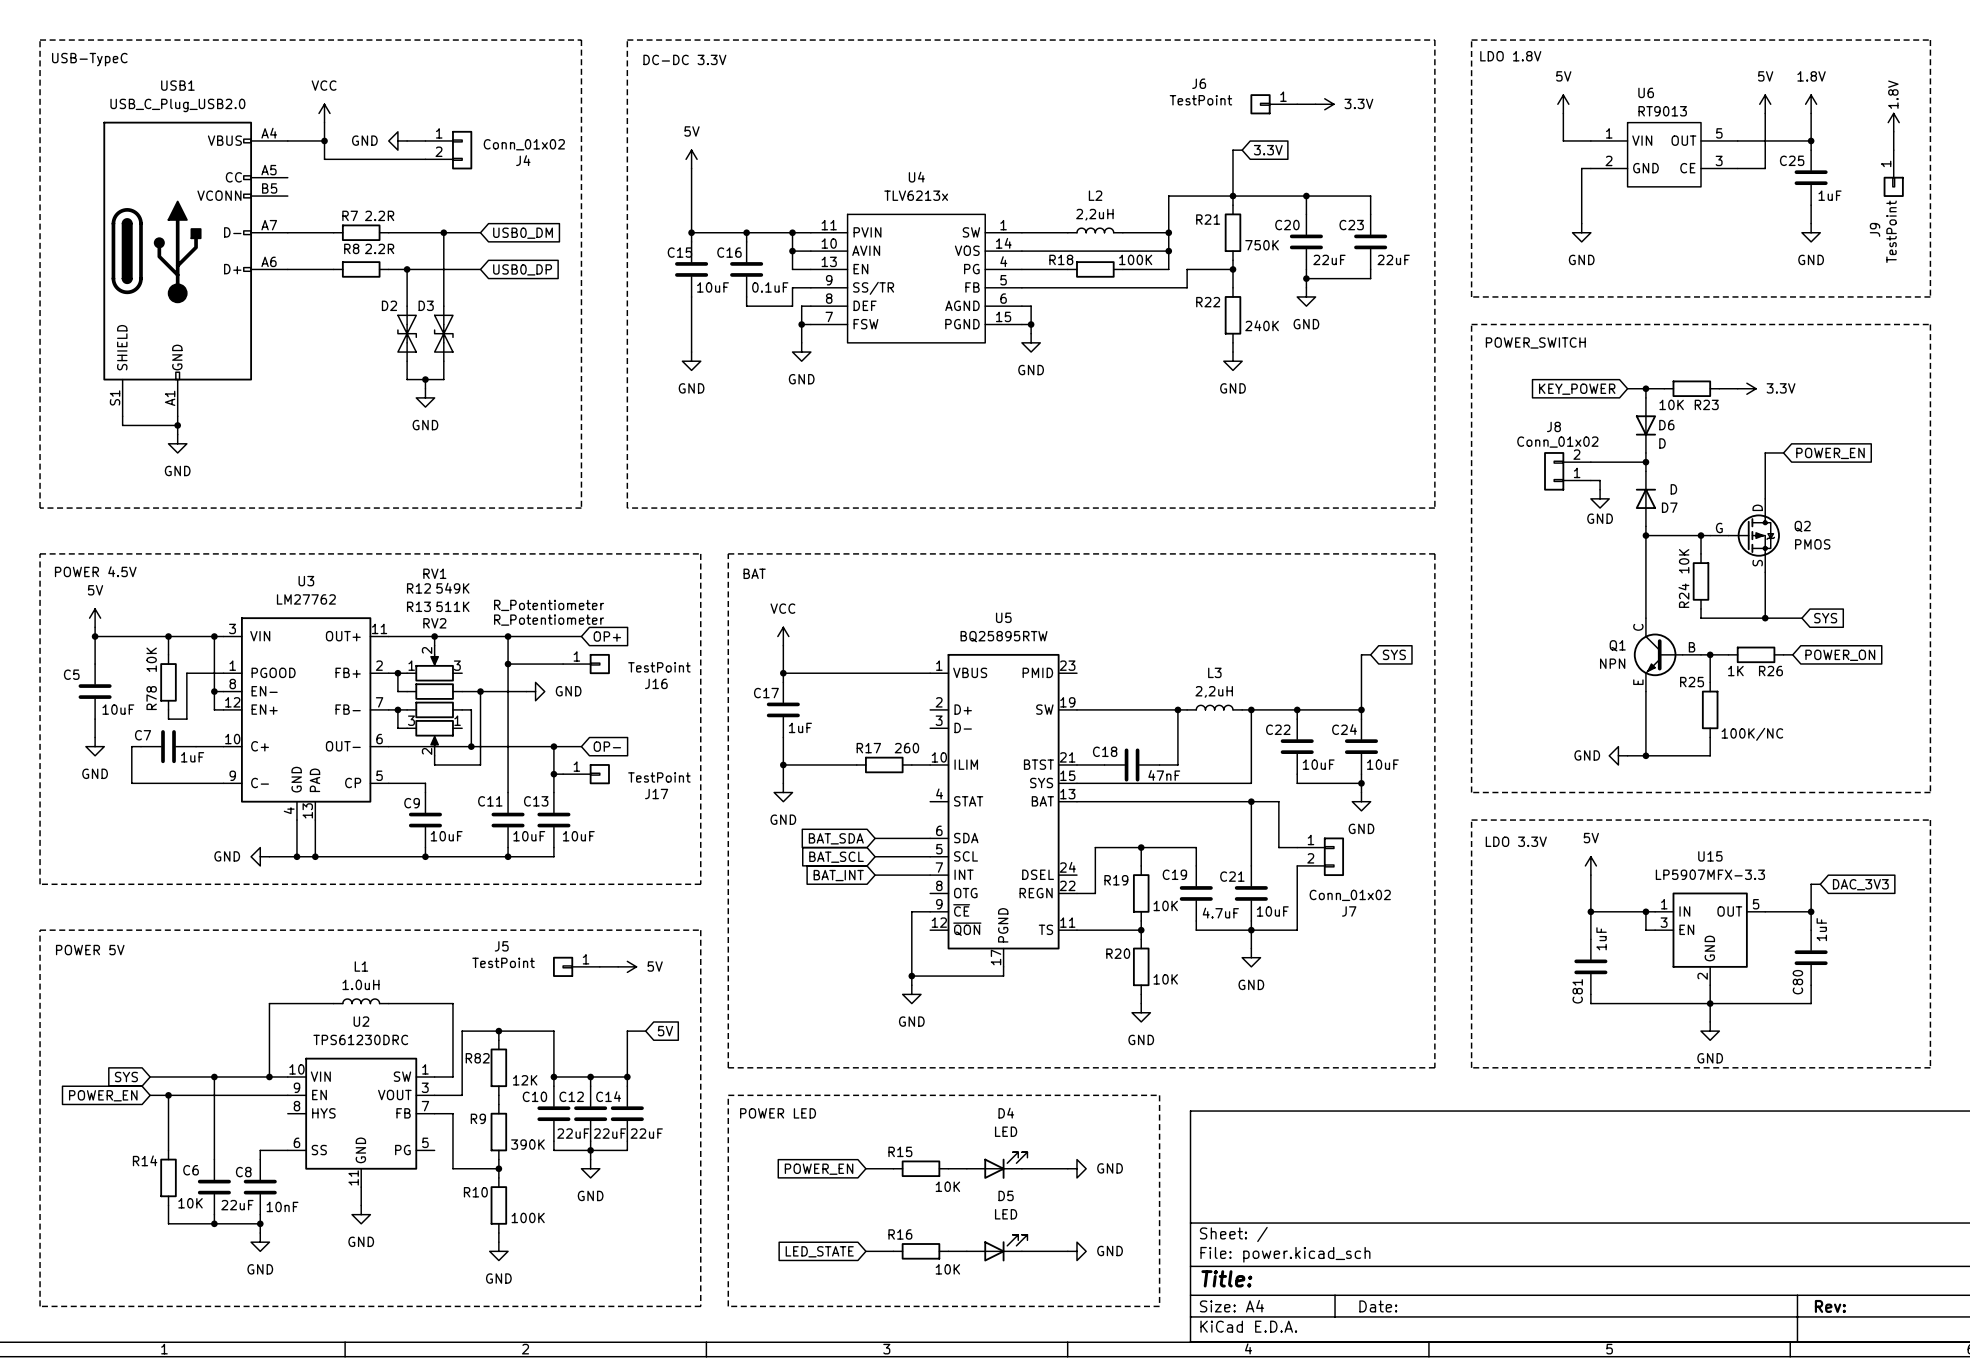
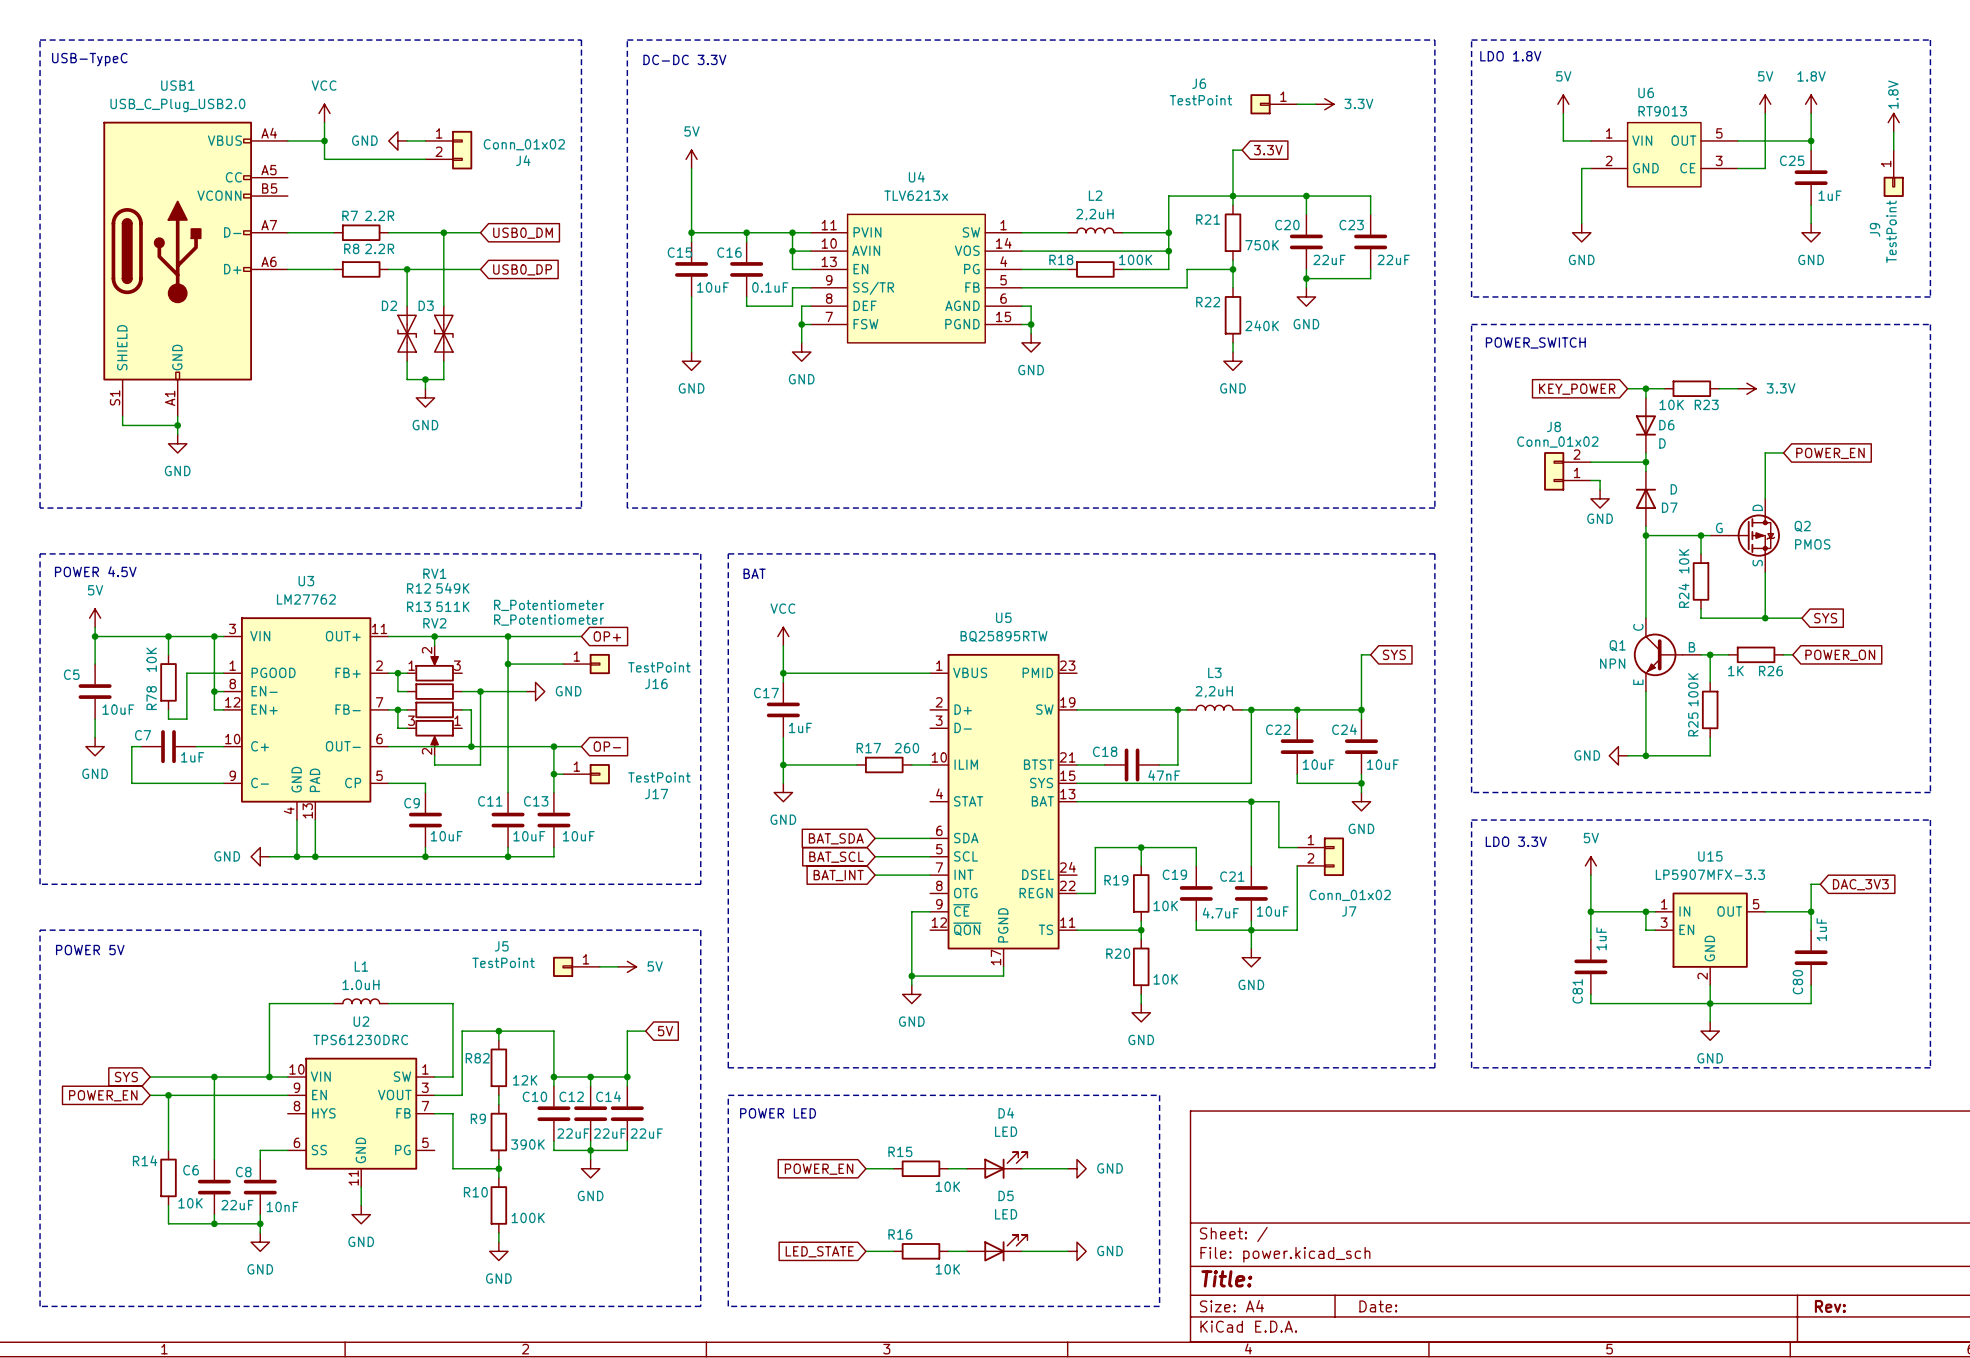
R25 name rotation: 0° (1692, 682) -> 90° counterclockwise (1693, 724)
R25 name position: R25 (1692, 682) -> R25 (1693, 724)
R25 value: 100K/NC (1752, 734) -> 100K (1693, 689)

